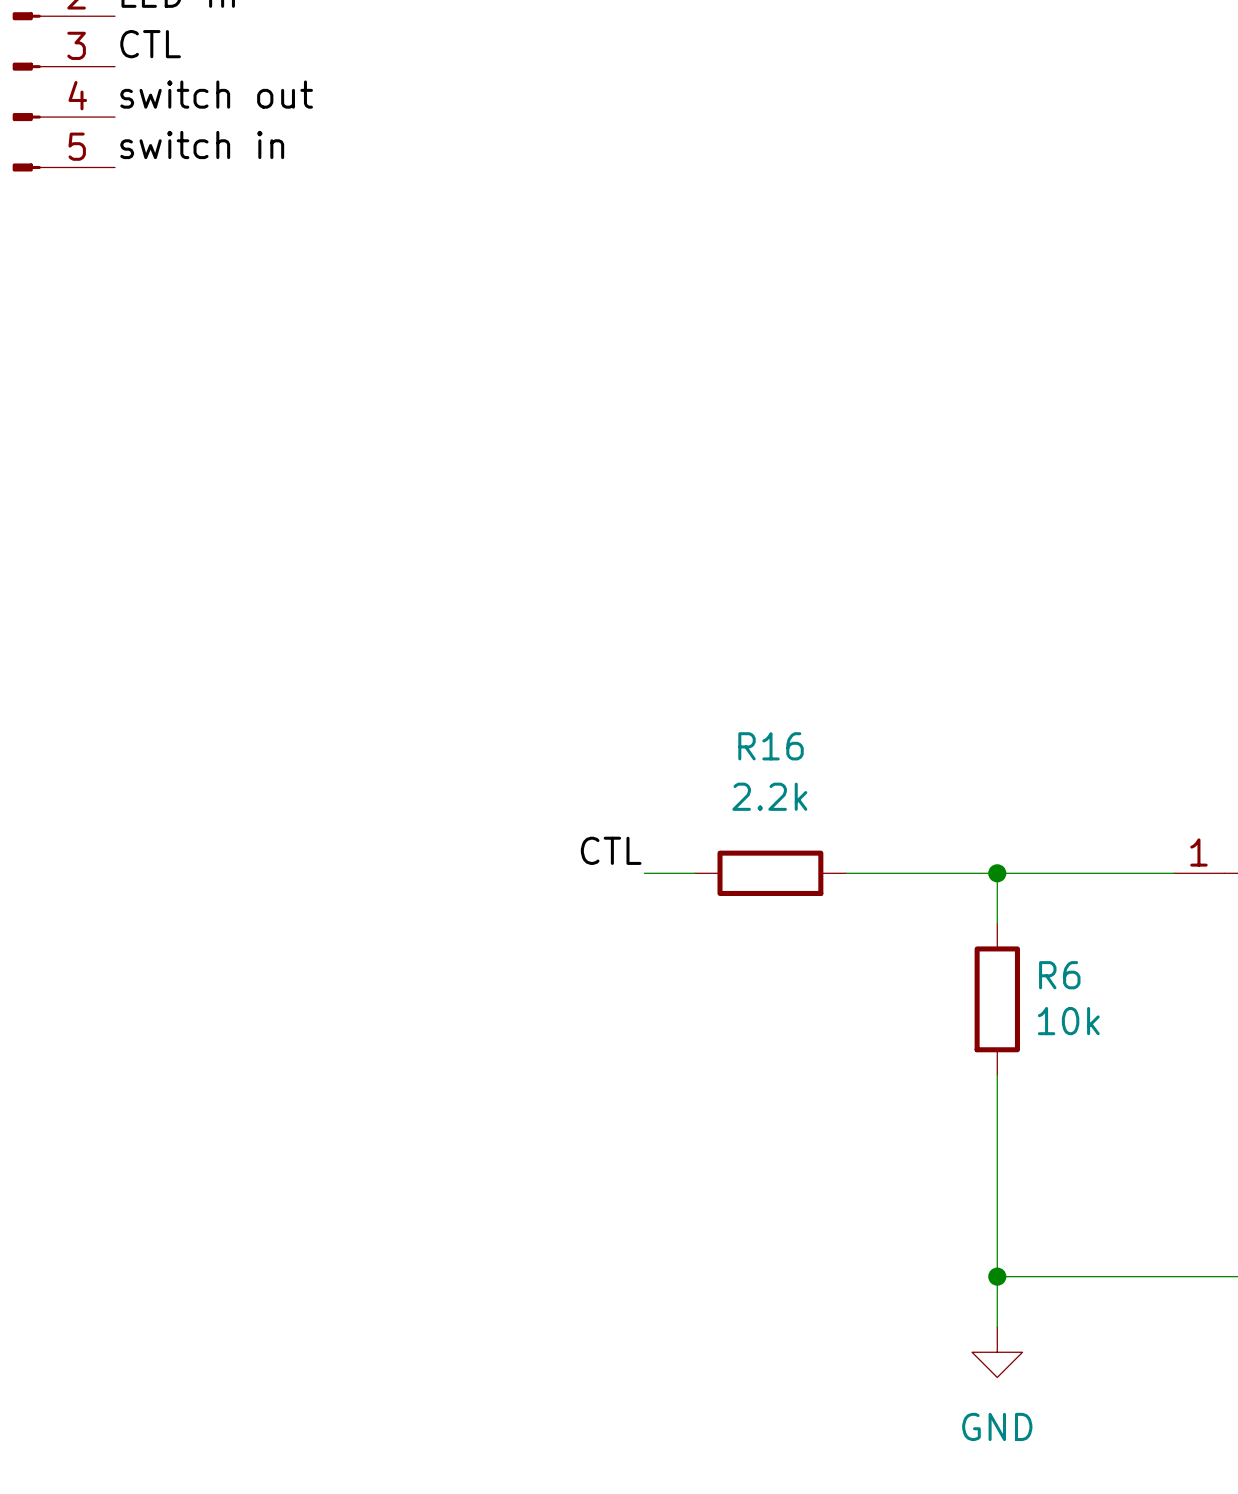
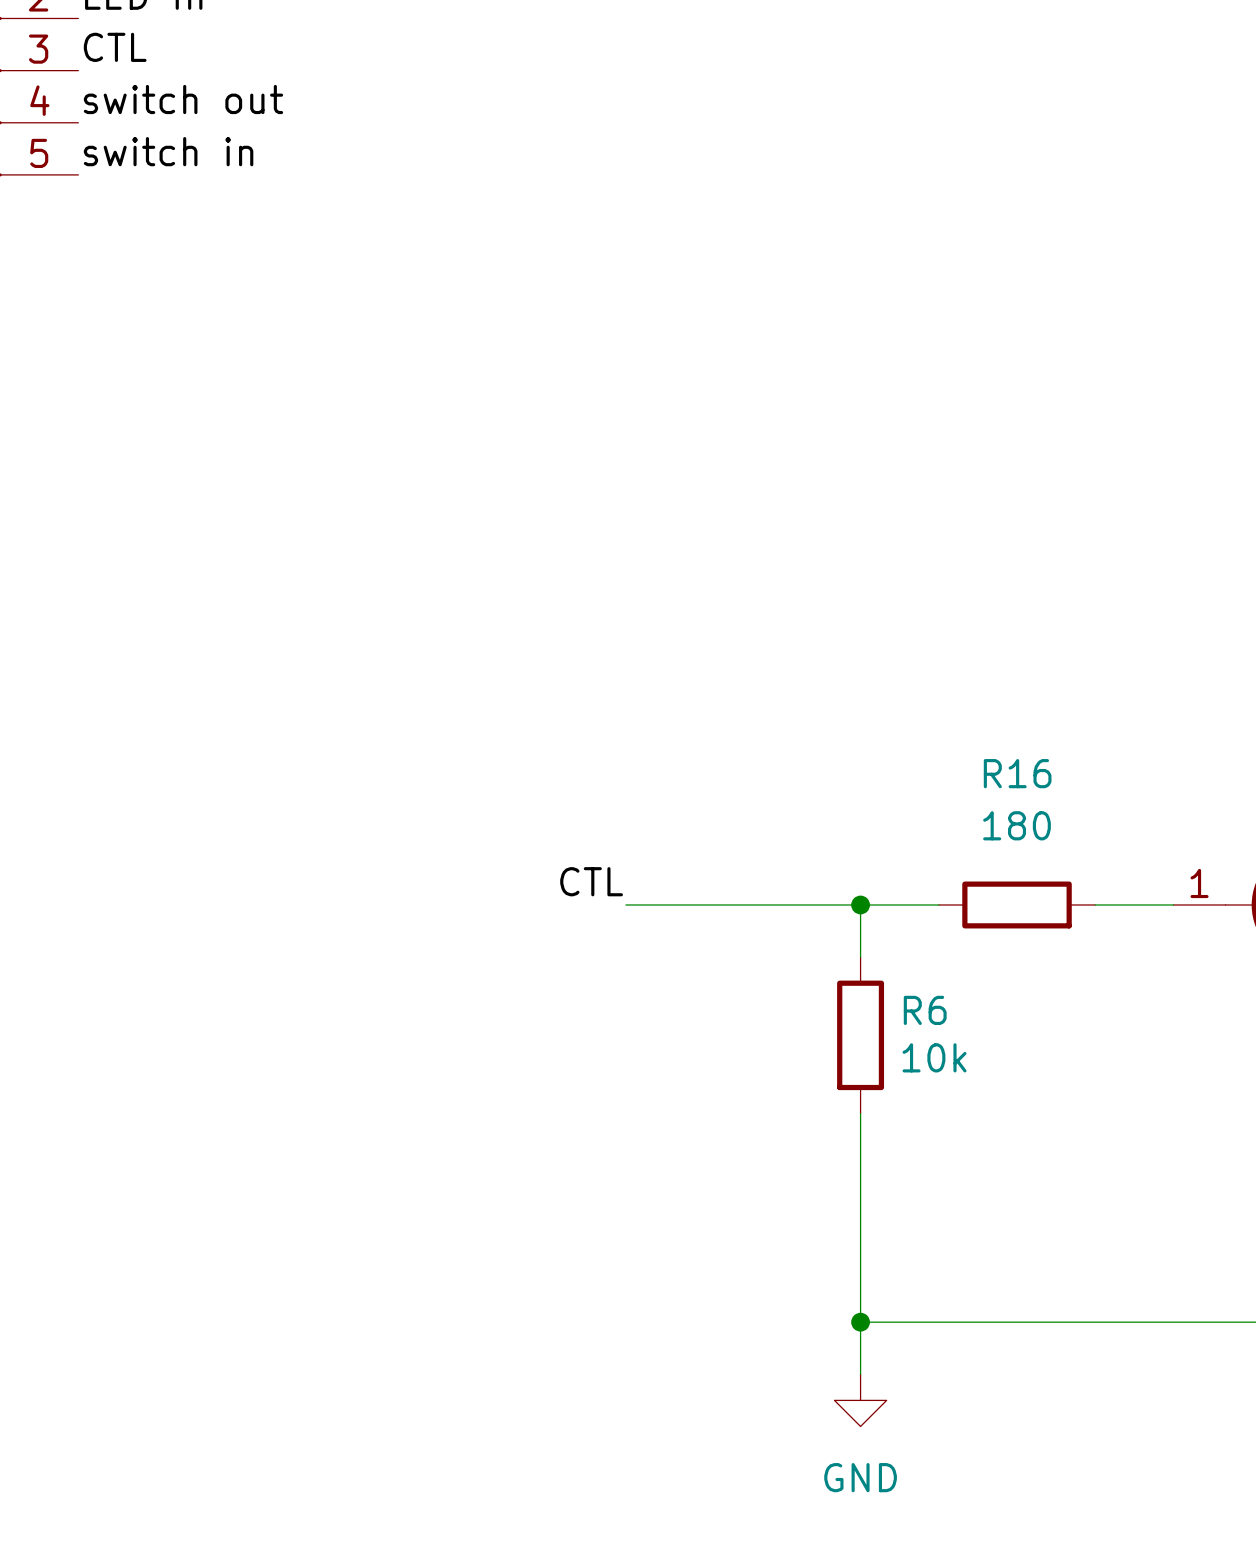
R16 value: 2.2k (769, 796) -> 180 (1017, 825)
R16 position: (770, 873) -> (1017, 904)
junction: none -> (860, 904)
wire: (946, 873) (1098, 873) -> (678, 904) (834, 904)
wire: (997, 873) (997, 923) -> (860, 904) (860, 957)
junction: (997, 873) -> none
R6 position: (997, 999) -> (860, 1035)
wire: (997, 1074) (997, 1327) -> (860, 1113) (860, 1374)
wire: none -> (860, 1322) (990, 1322)
junction: none -> (860, 1322)
junction: (997, 1276) -> none
power symbol position: GND (997, 1352) -> GND (860, 1400)

